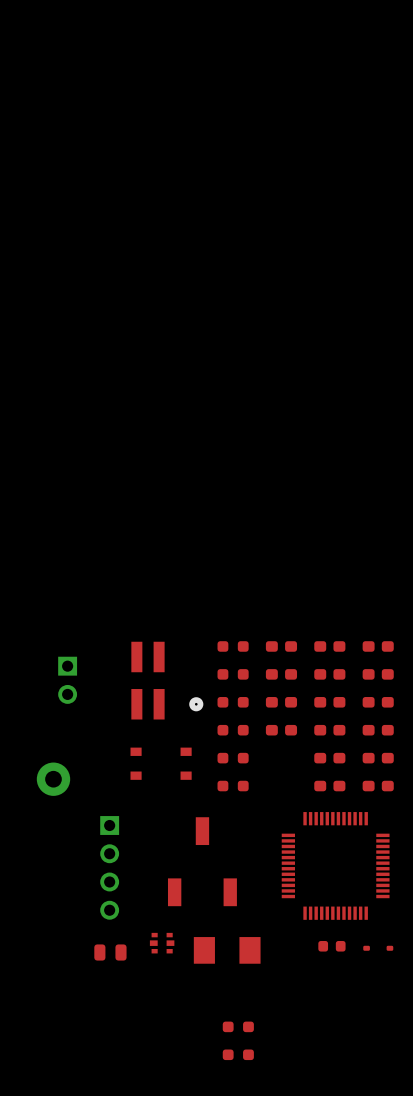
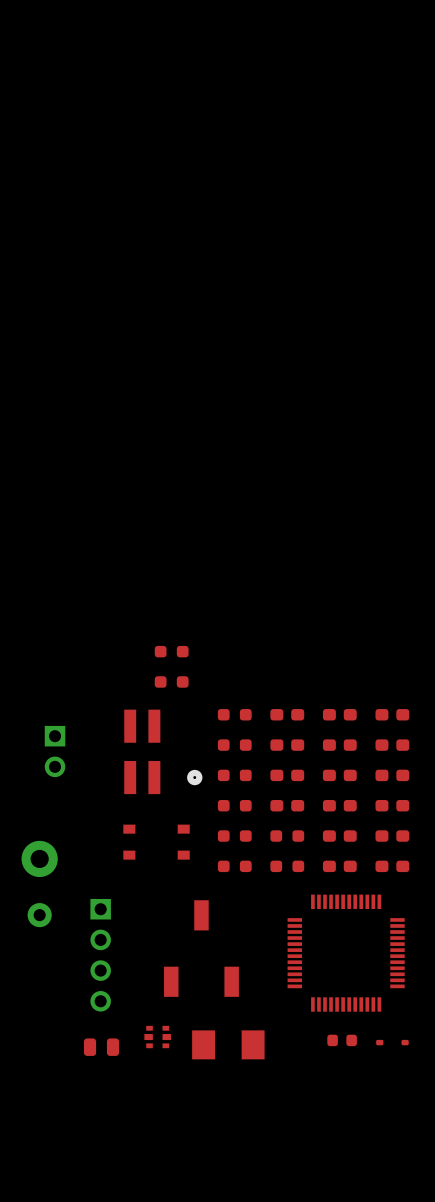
part: none -> (171, 651)
part: none -> (171, 681)
part: none -> (287, 836)
part: none -> (287, 866)
part: none -> (39, 915)
part: (238, 1026) -> none
part: (238, 1054) -> none

